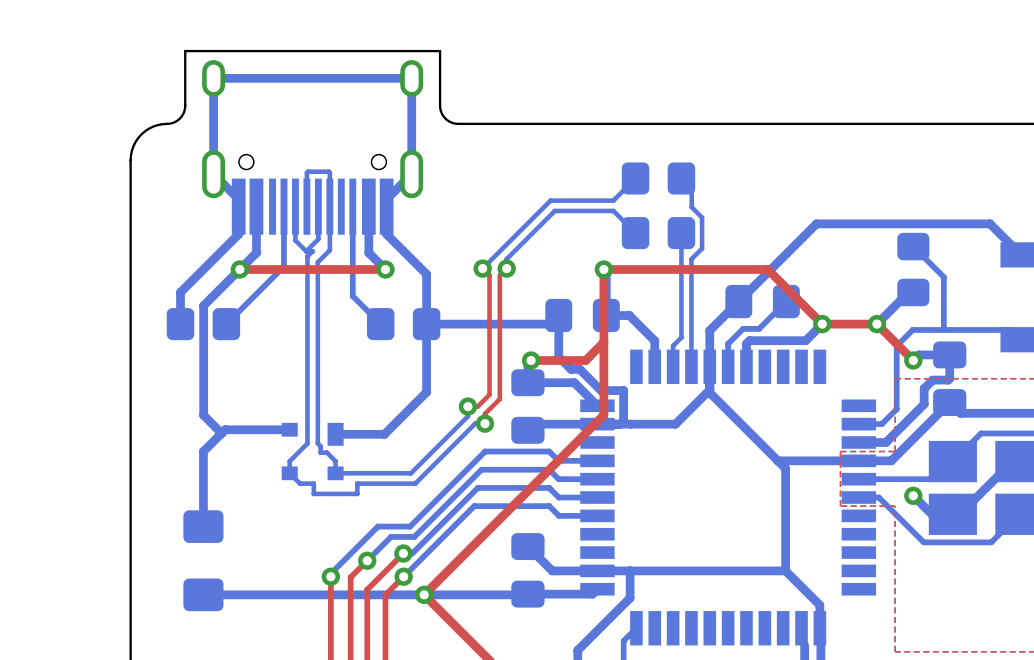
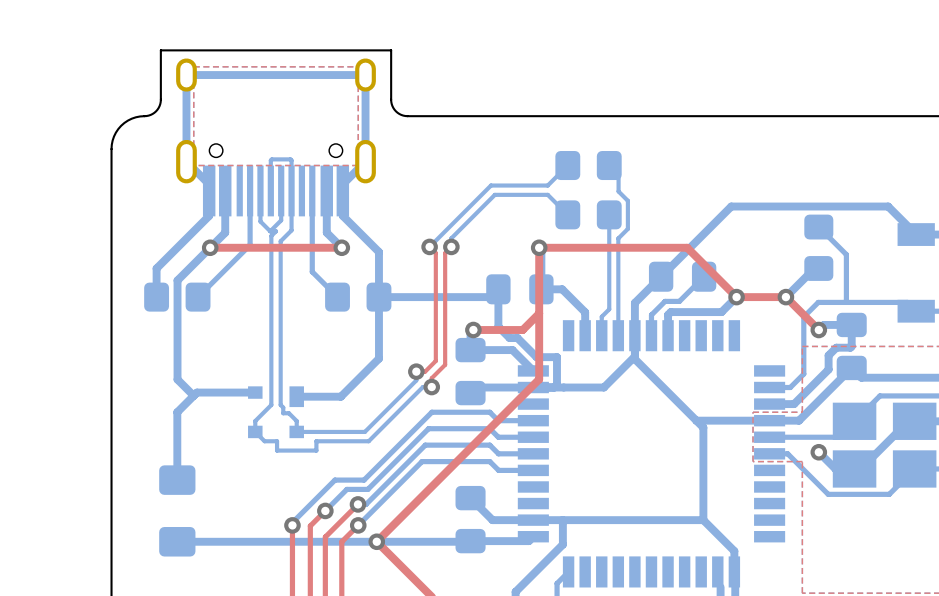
top zone outline: none -> (193, 66) (193, 165) (358, 165) (358, 66) (193, 66)

